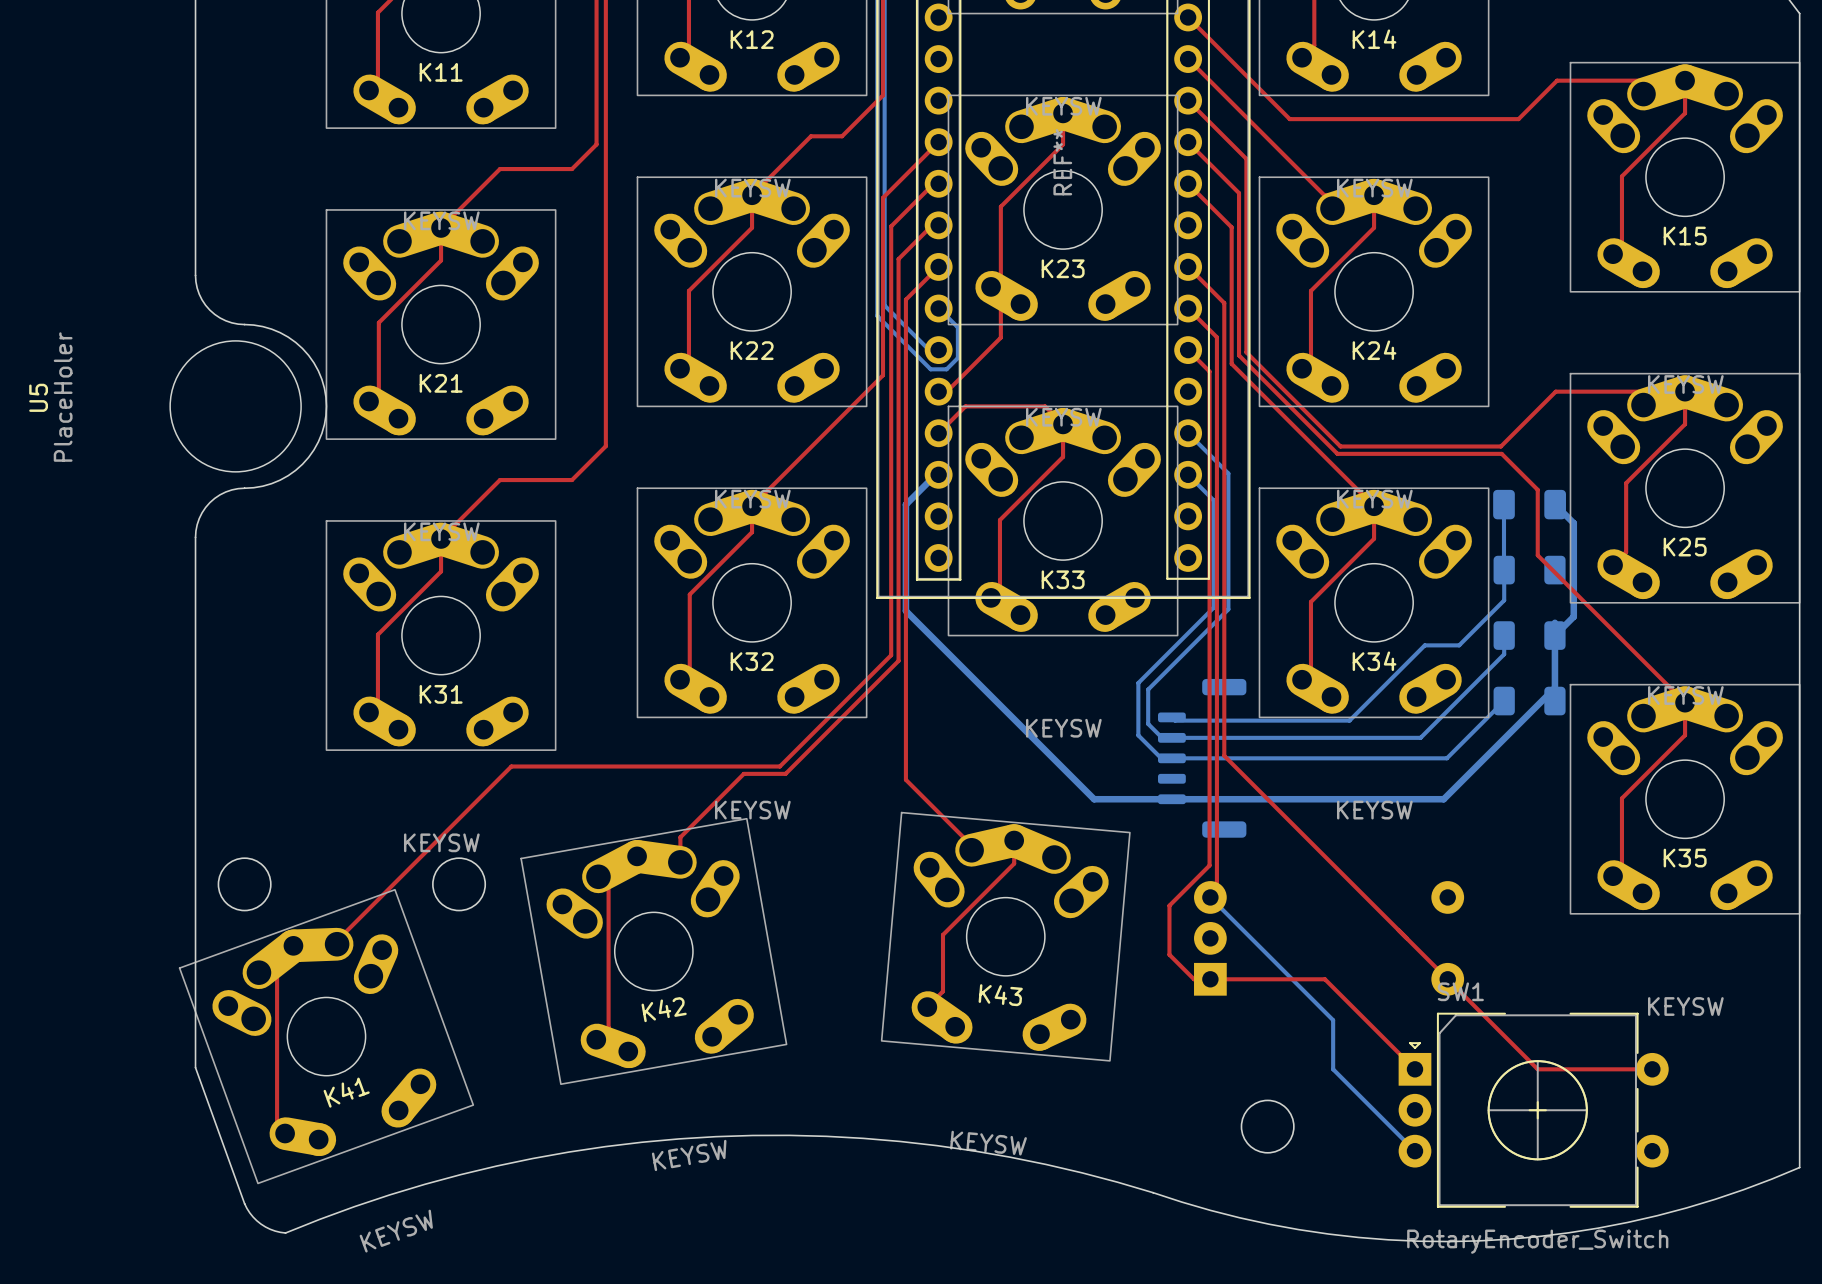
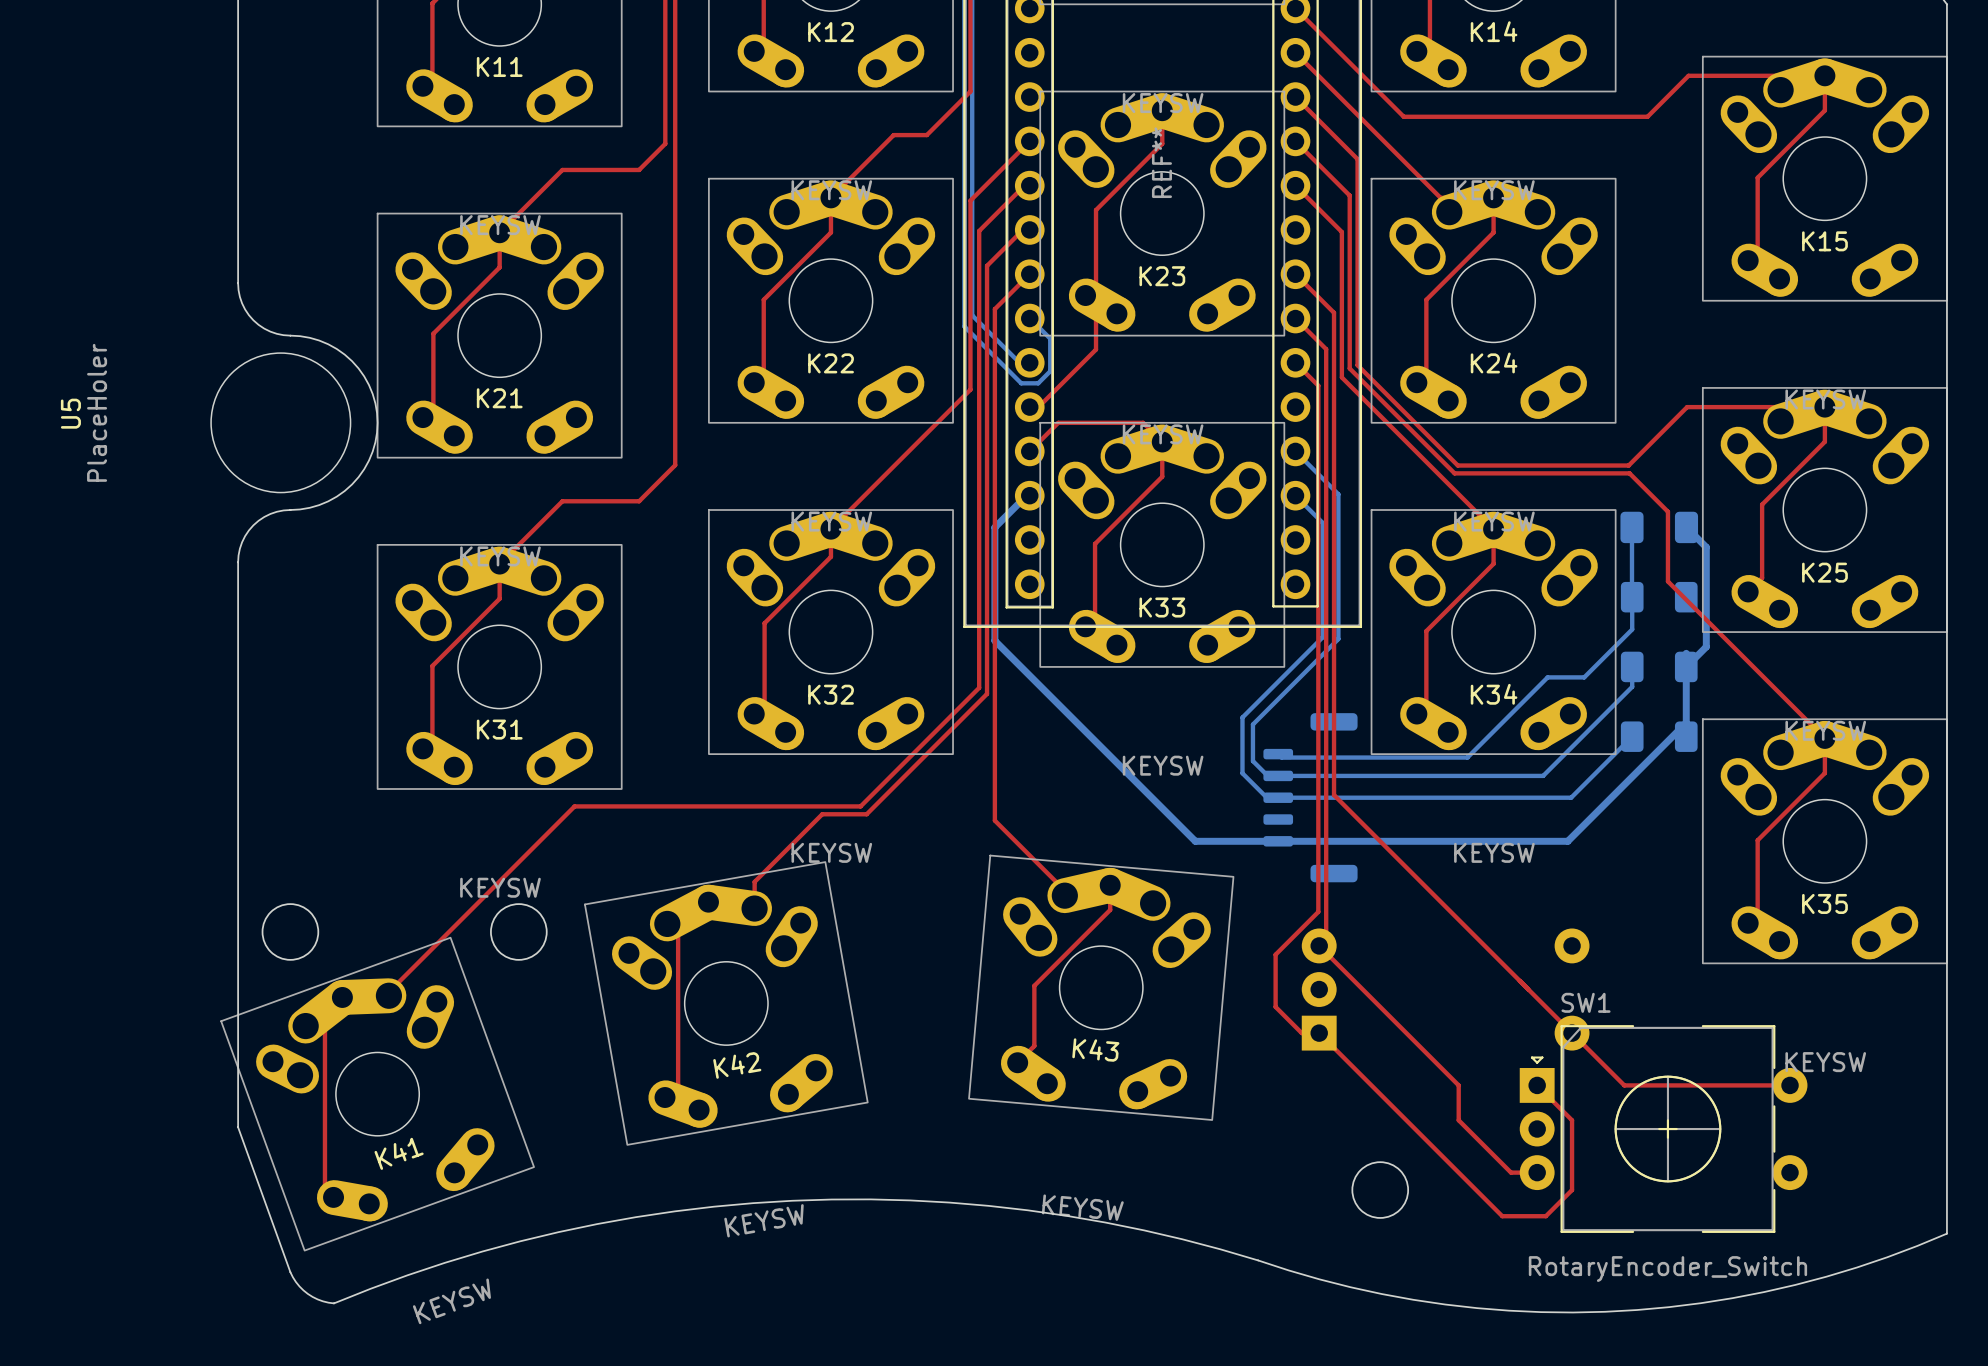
bottom track: (1210, 897) (1333, 1020) (1333, 1069) (1414, 1151) -> none
top track: none -> (1319, 945) (1458, 1085) (1458, 1120) (1511, 1172) (1537, 1172)
top track: (1210, 979) (1324, 979) (1414, 1069) -> (1319, 1033) (1502, 1216) (1545, 1216) (1572, 1190) (1572, 1120) (1537, 1085)
top track: (1496, 1028) (1537, 1069) (1652, 1069) -> (1624, 1085) (1790, 1085)
SW1 position: (1533, 1110) -> (1663, 1129)

